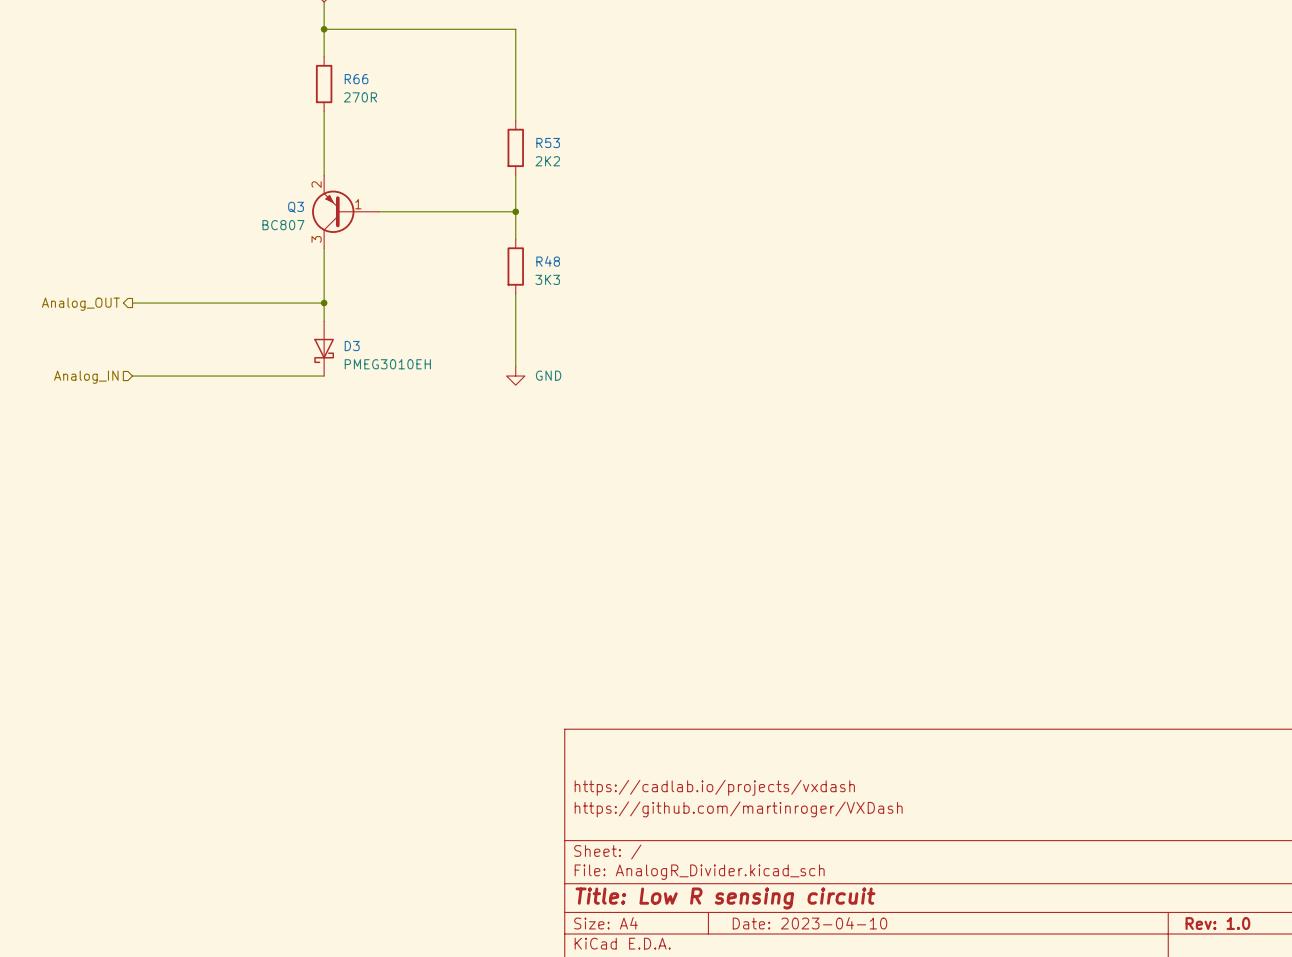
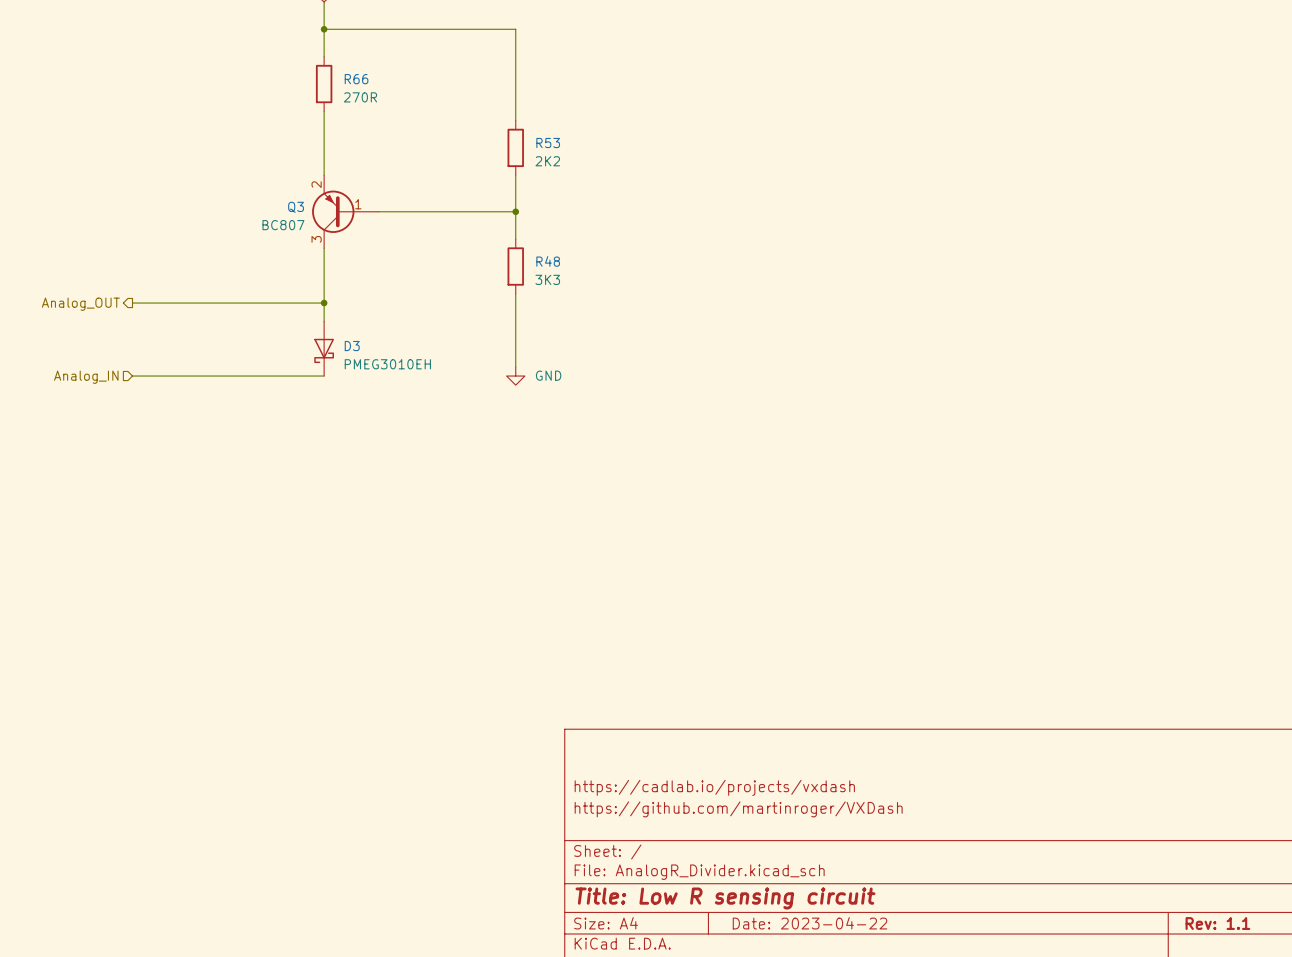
title block: Date: 2023-04-10 (810, 923) -> Date: 2023-04-22 (810, 923)
title block: Rev: 1.0 (1217, 923) -> Rev: 1.1 (1217, 923)

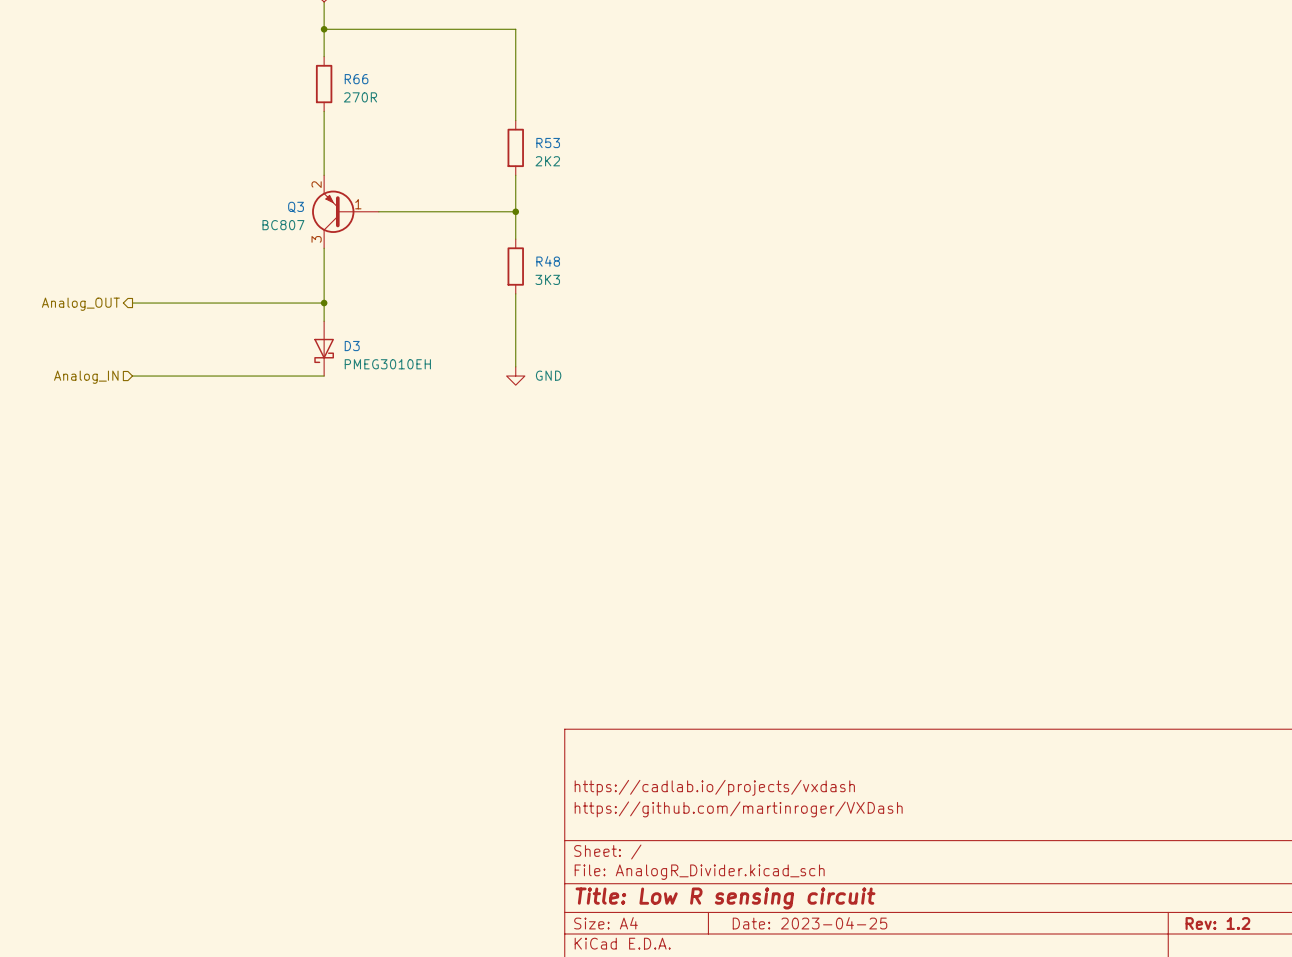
title block: Date: 2023-04-22 (810, 923) -> Date: 2023-04-25 (810, 923)
title block: Rev: 1.1 (1217, 923) -> Rev: 1.2 (1217, 923)

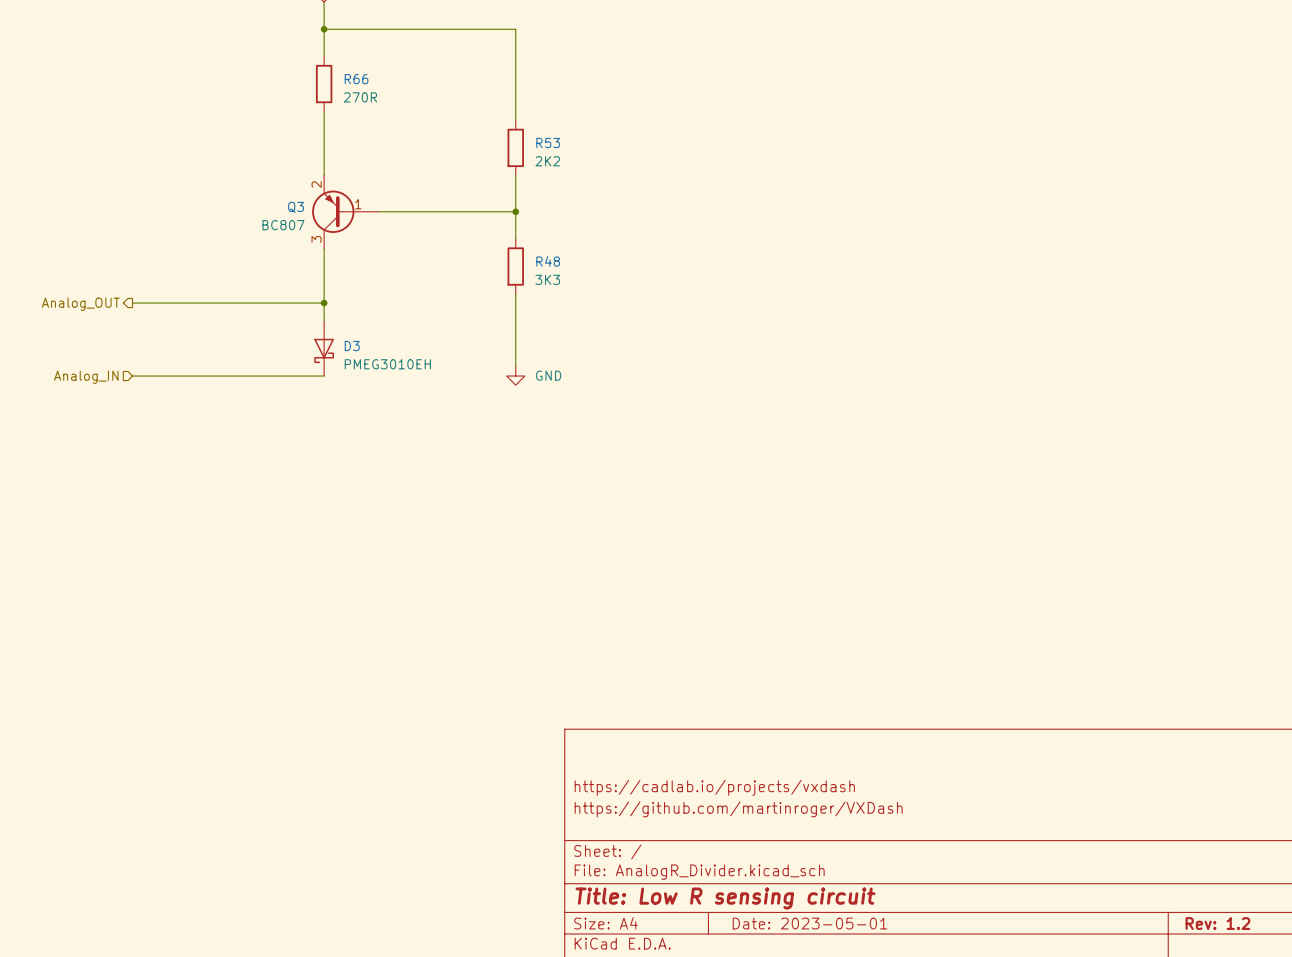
title block: Date: 2023-04-25 (810, 923) -> Date: 2023-05-01 (810, 923)

